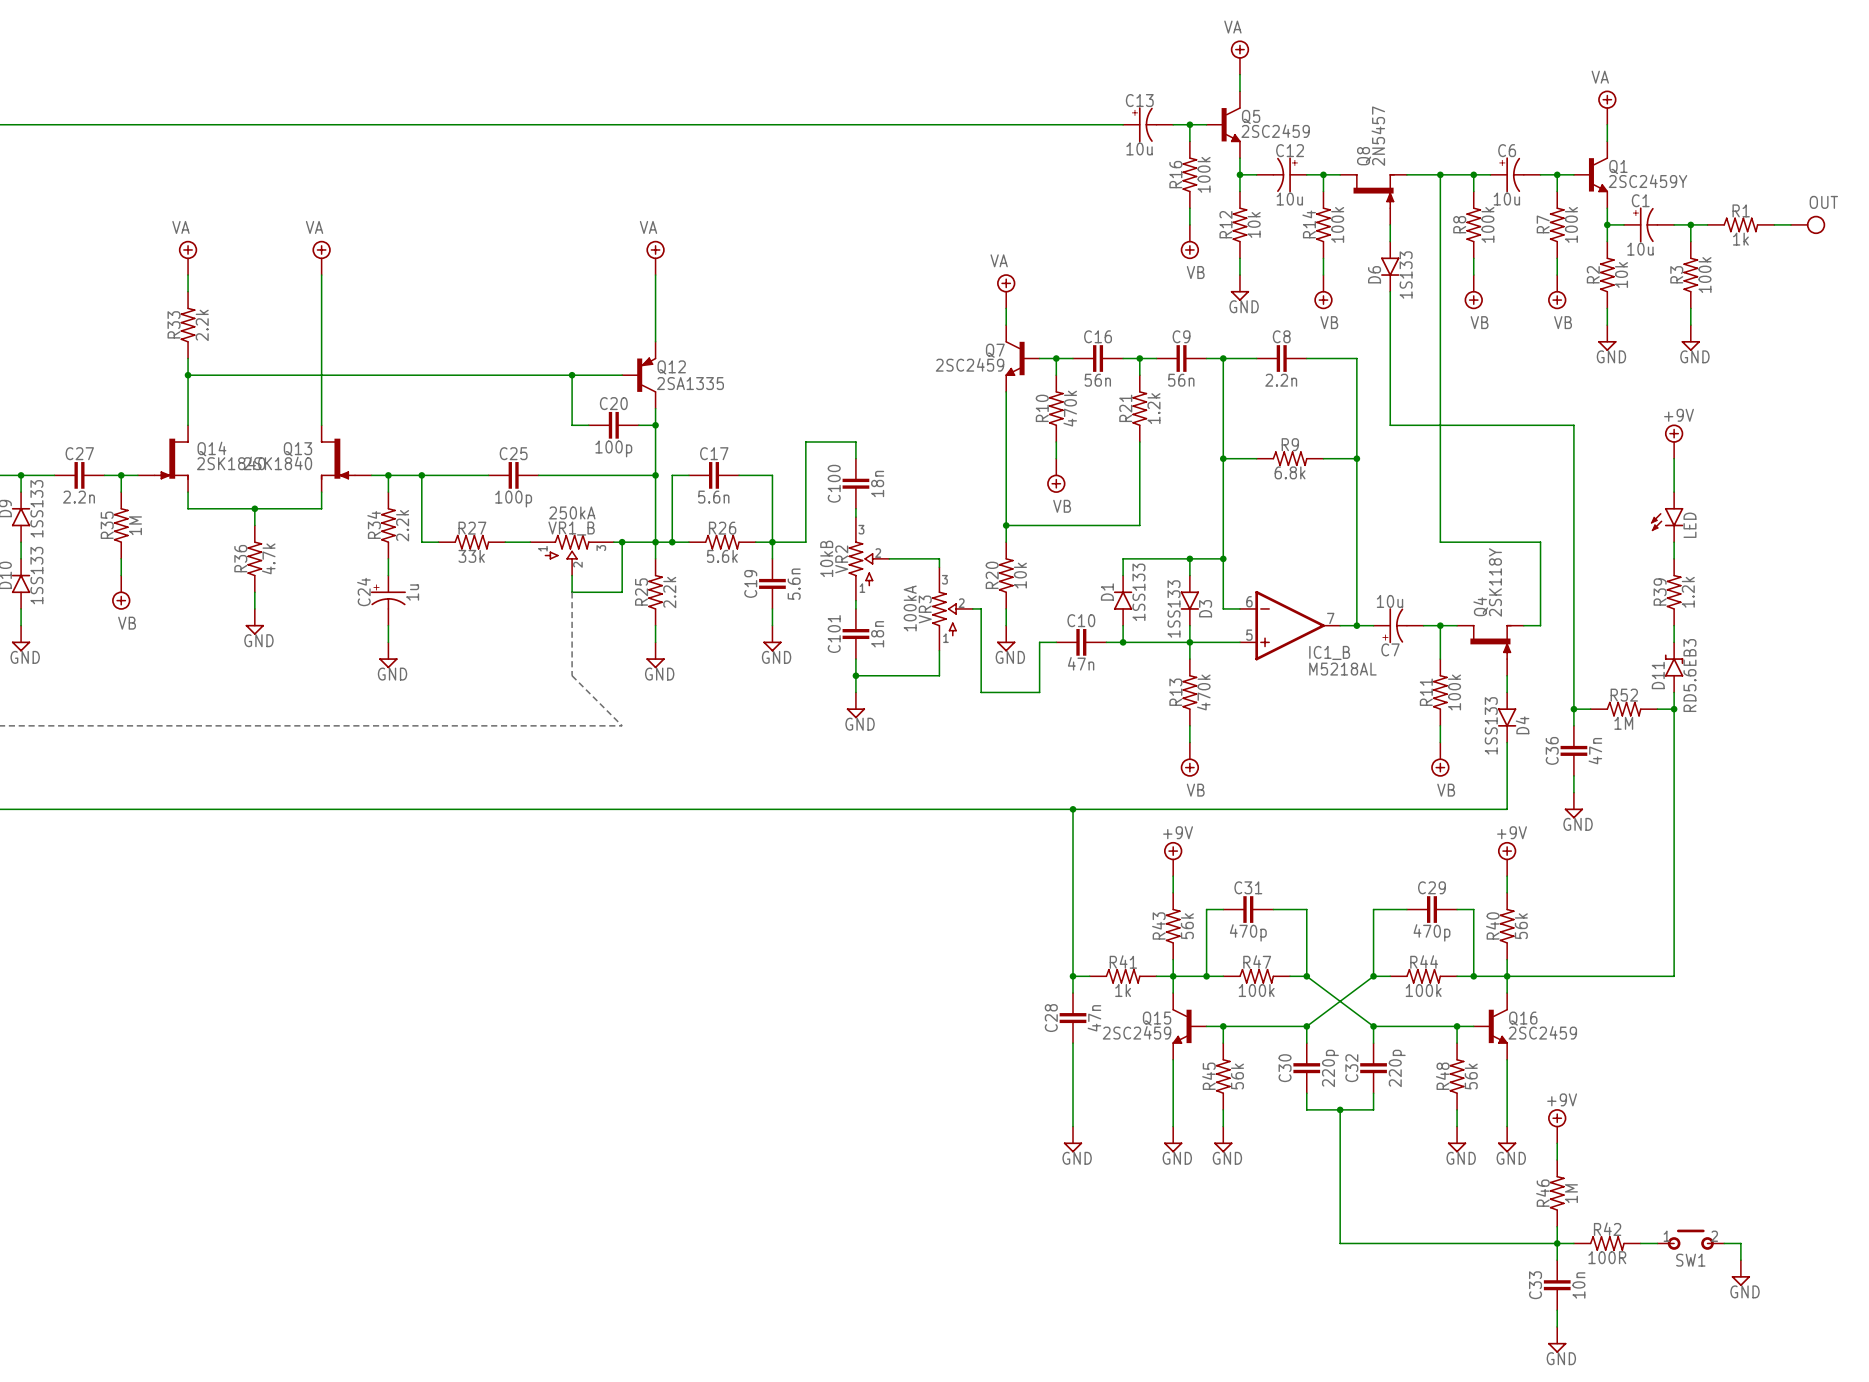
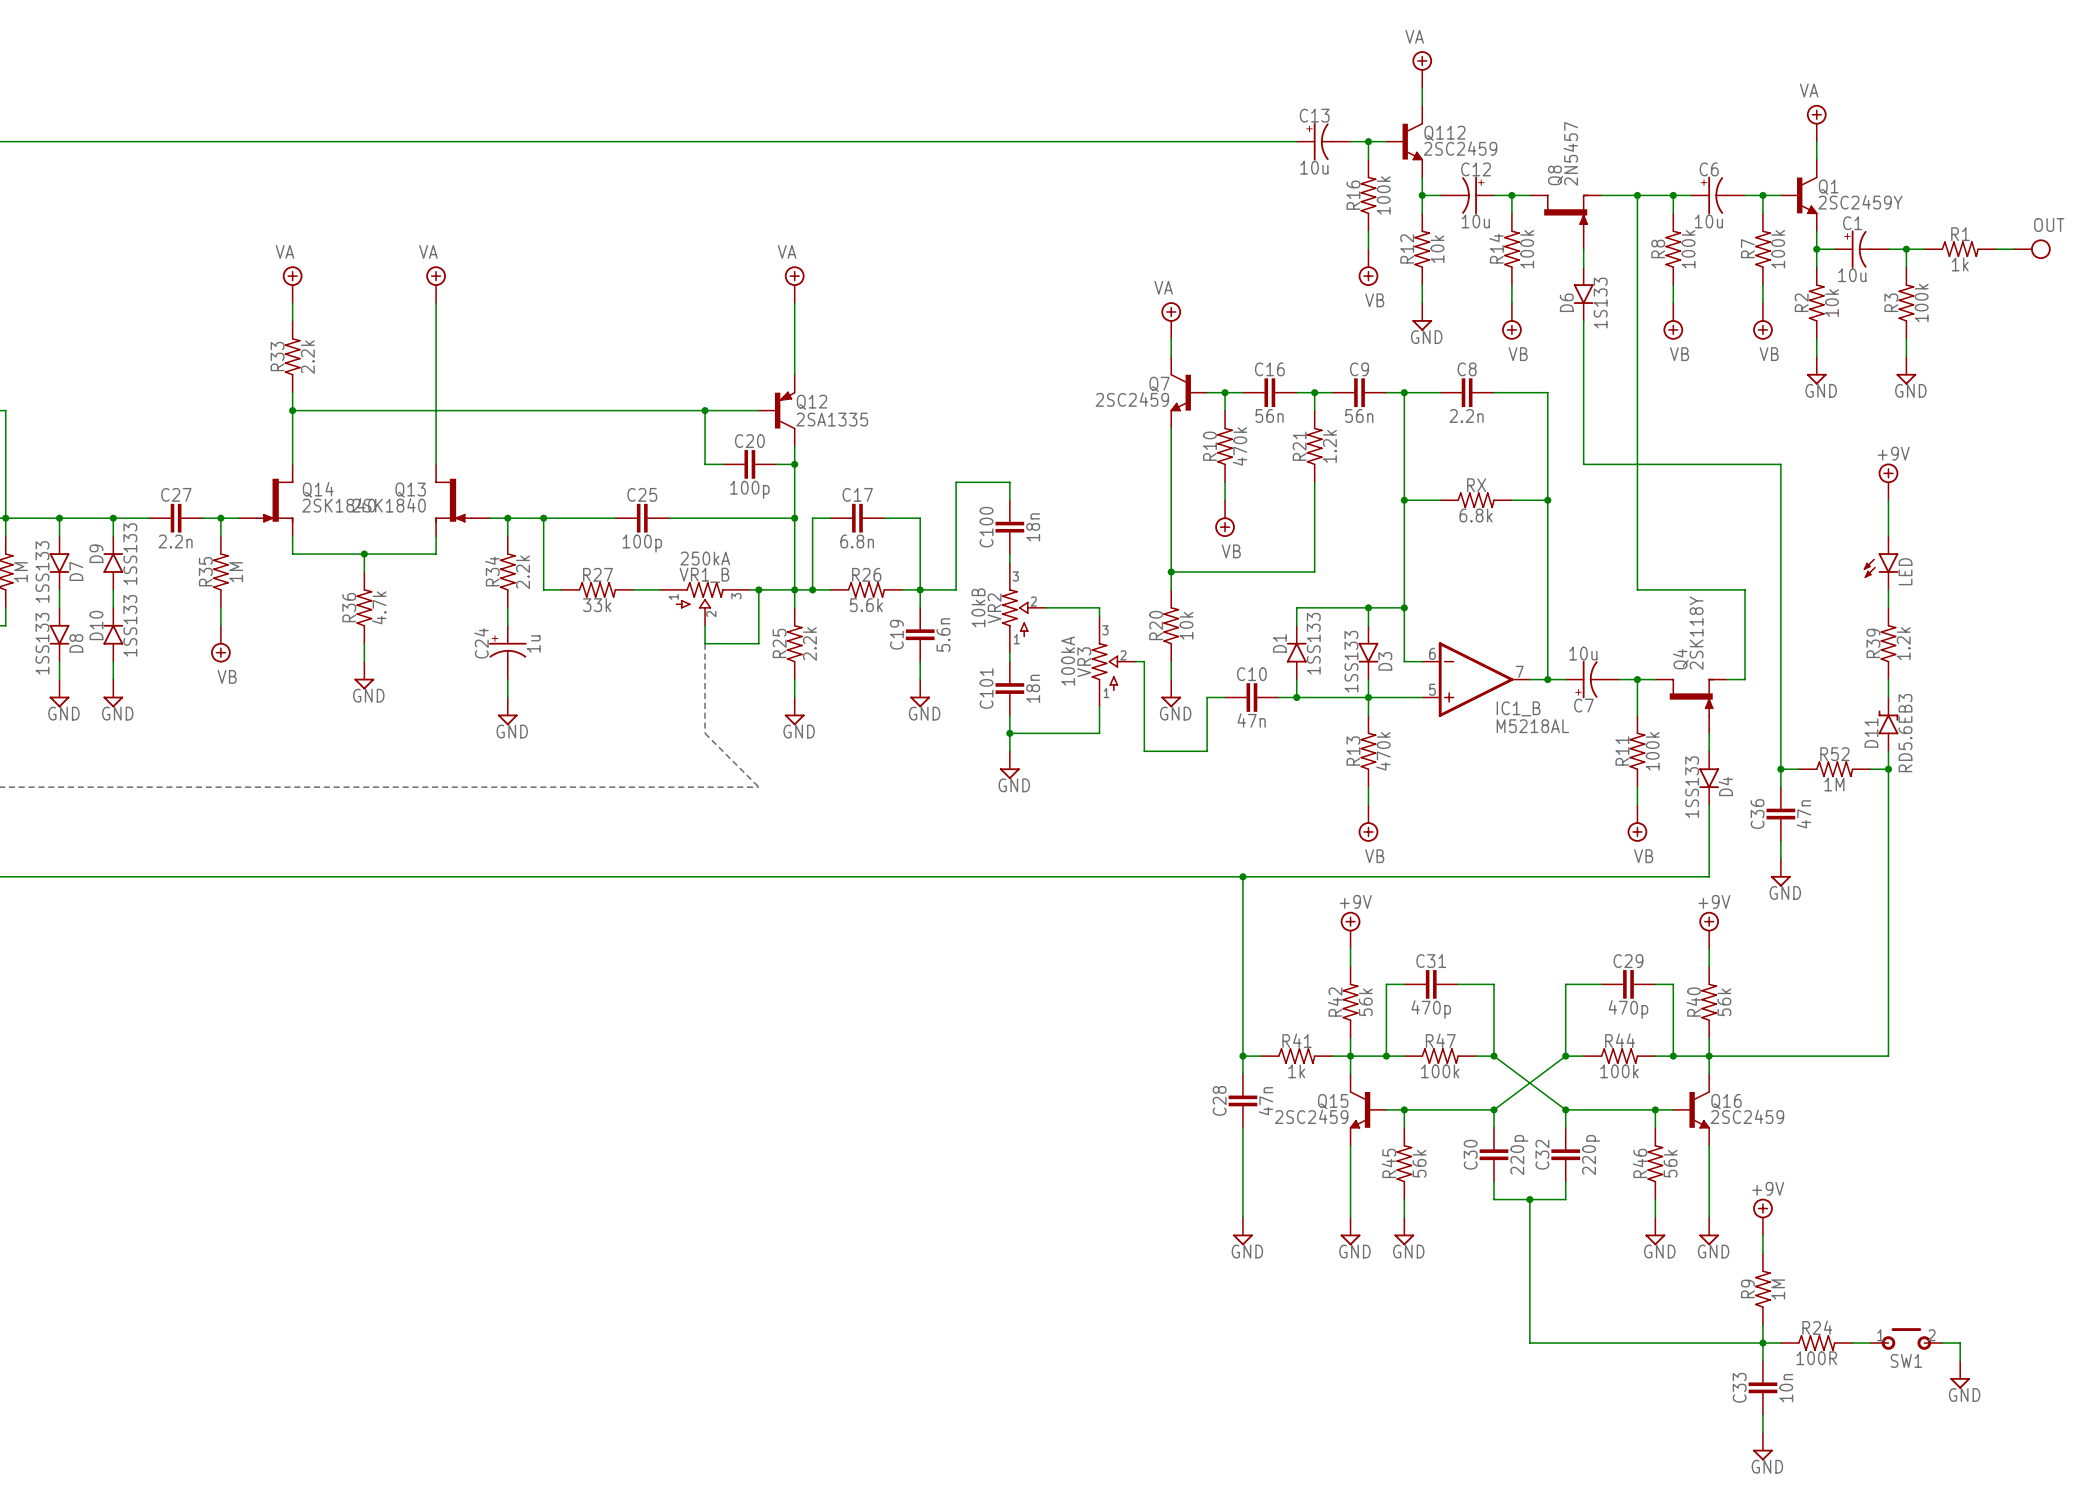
Q5 name: Q5 (1251, 116) -> Q112 (1444, 133)
R9 name: R9 (1290, 444) -> RX (1476, 485)
C17 value: 5.6n (713, 497) -> 6.8n (857, 541)
R43 name: R43 (1158, 925) -> R42 (1335, 1002)
R48 name: R48 (1442, 1076) -> R46 (1640, 1163)
R46 name: R46 (1542, 1193) -> R9 (1747, 1288)
R42 name: R42 (1607, 1229) -> R24 (1817, 1327)

